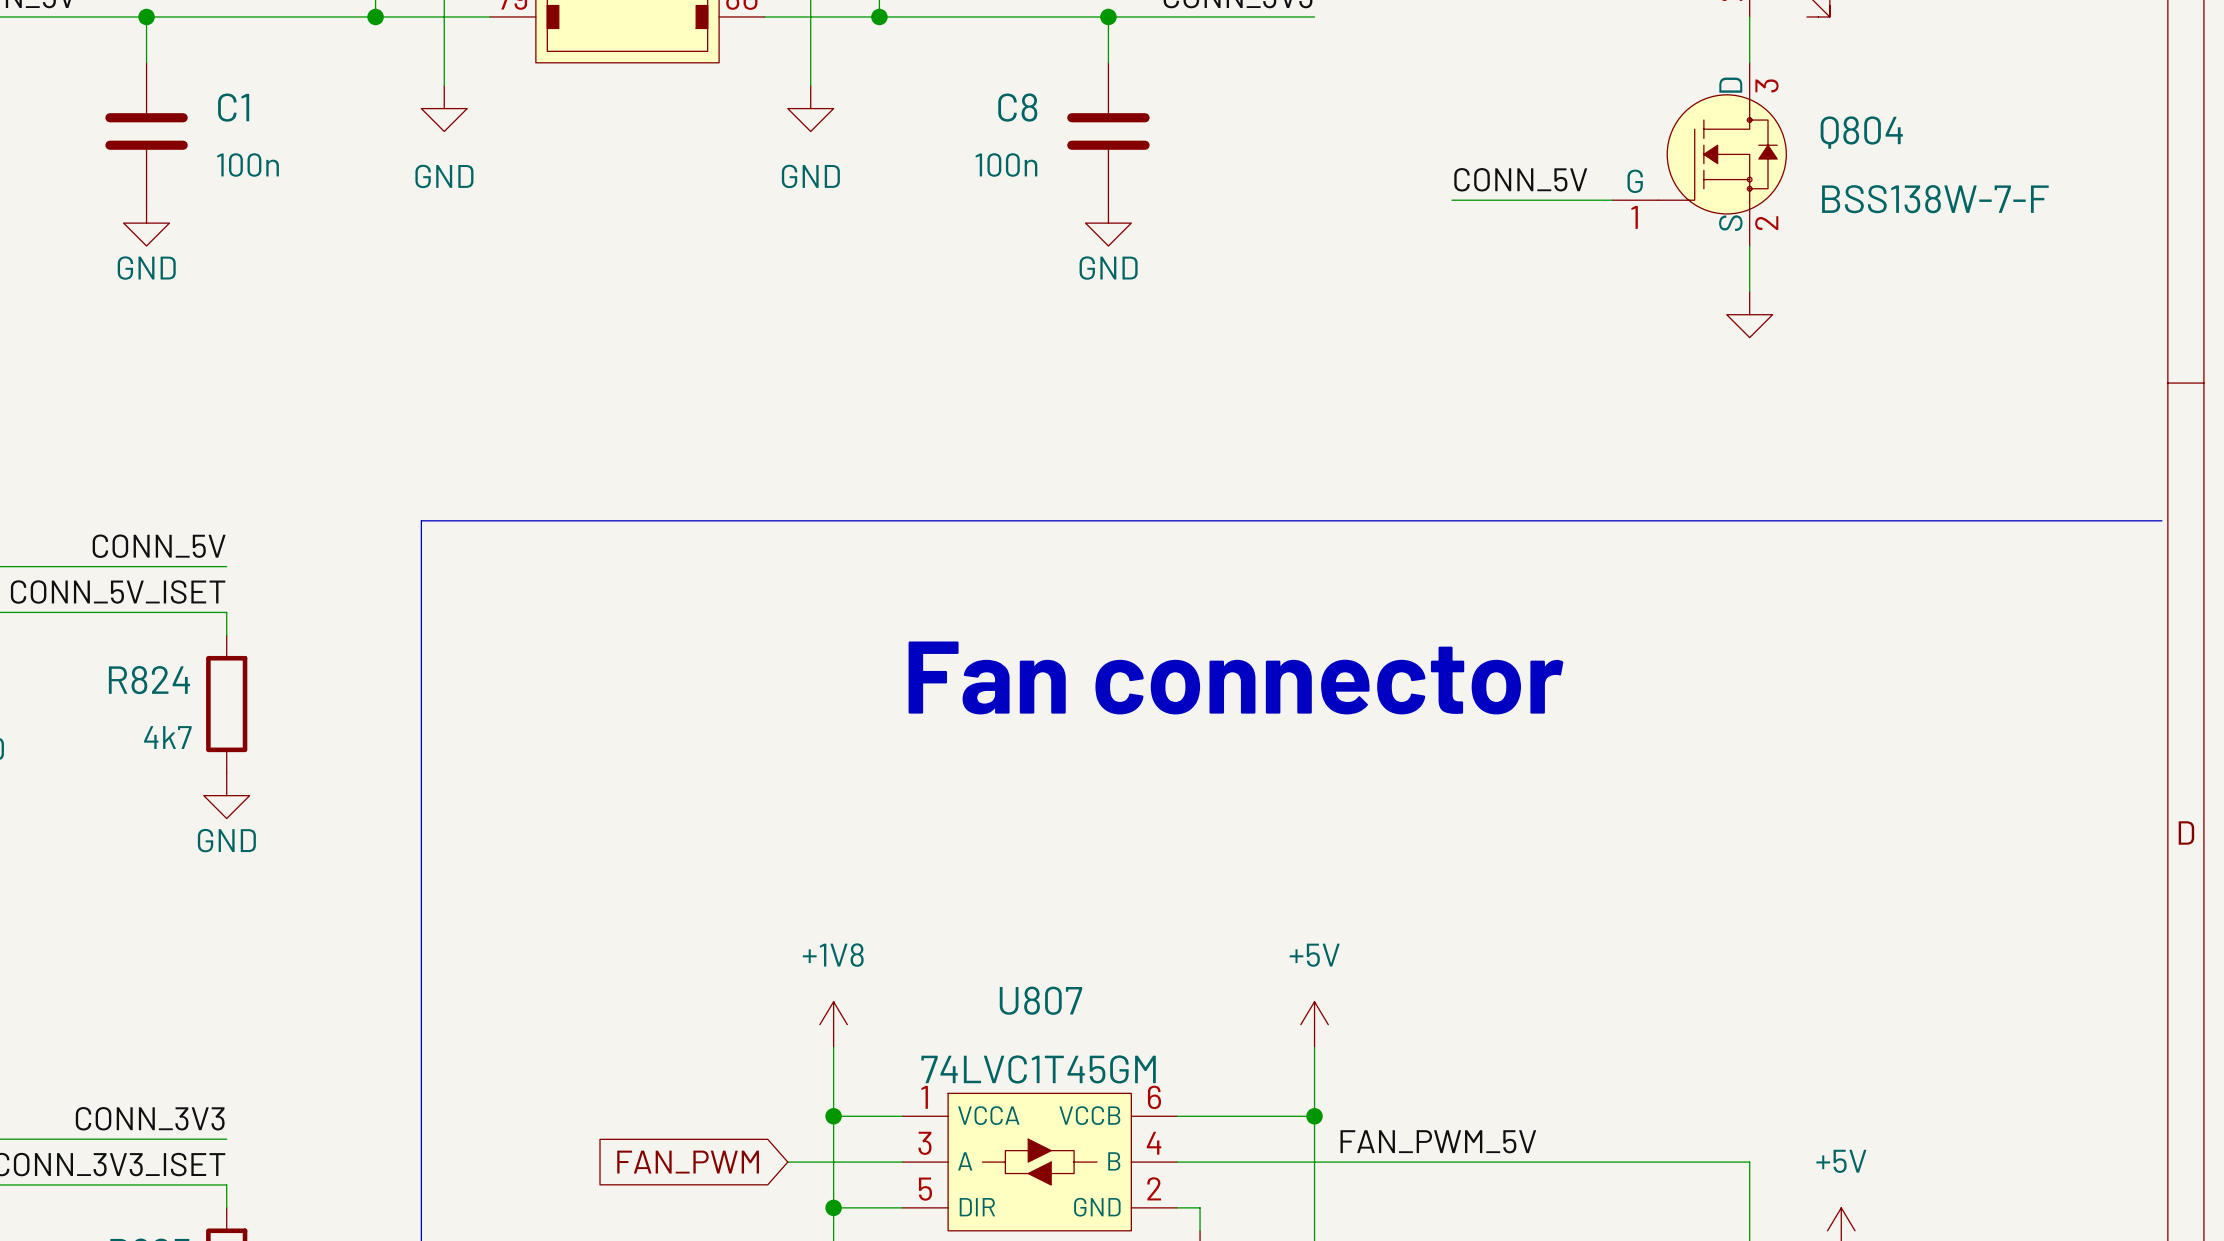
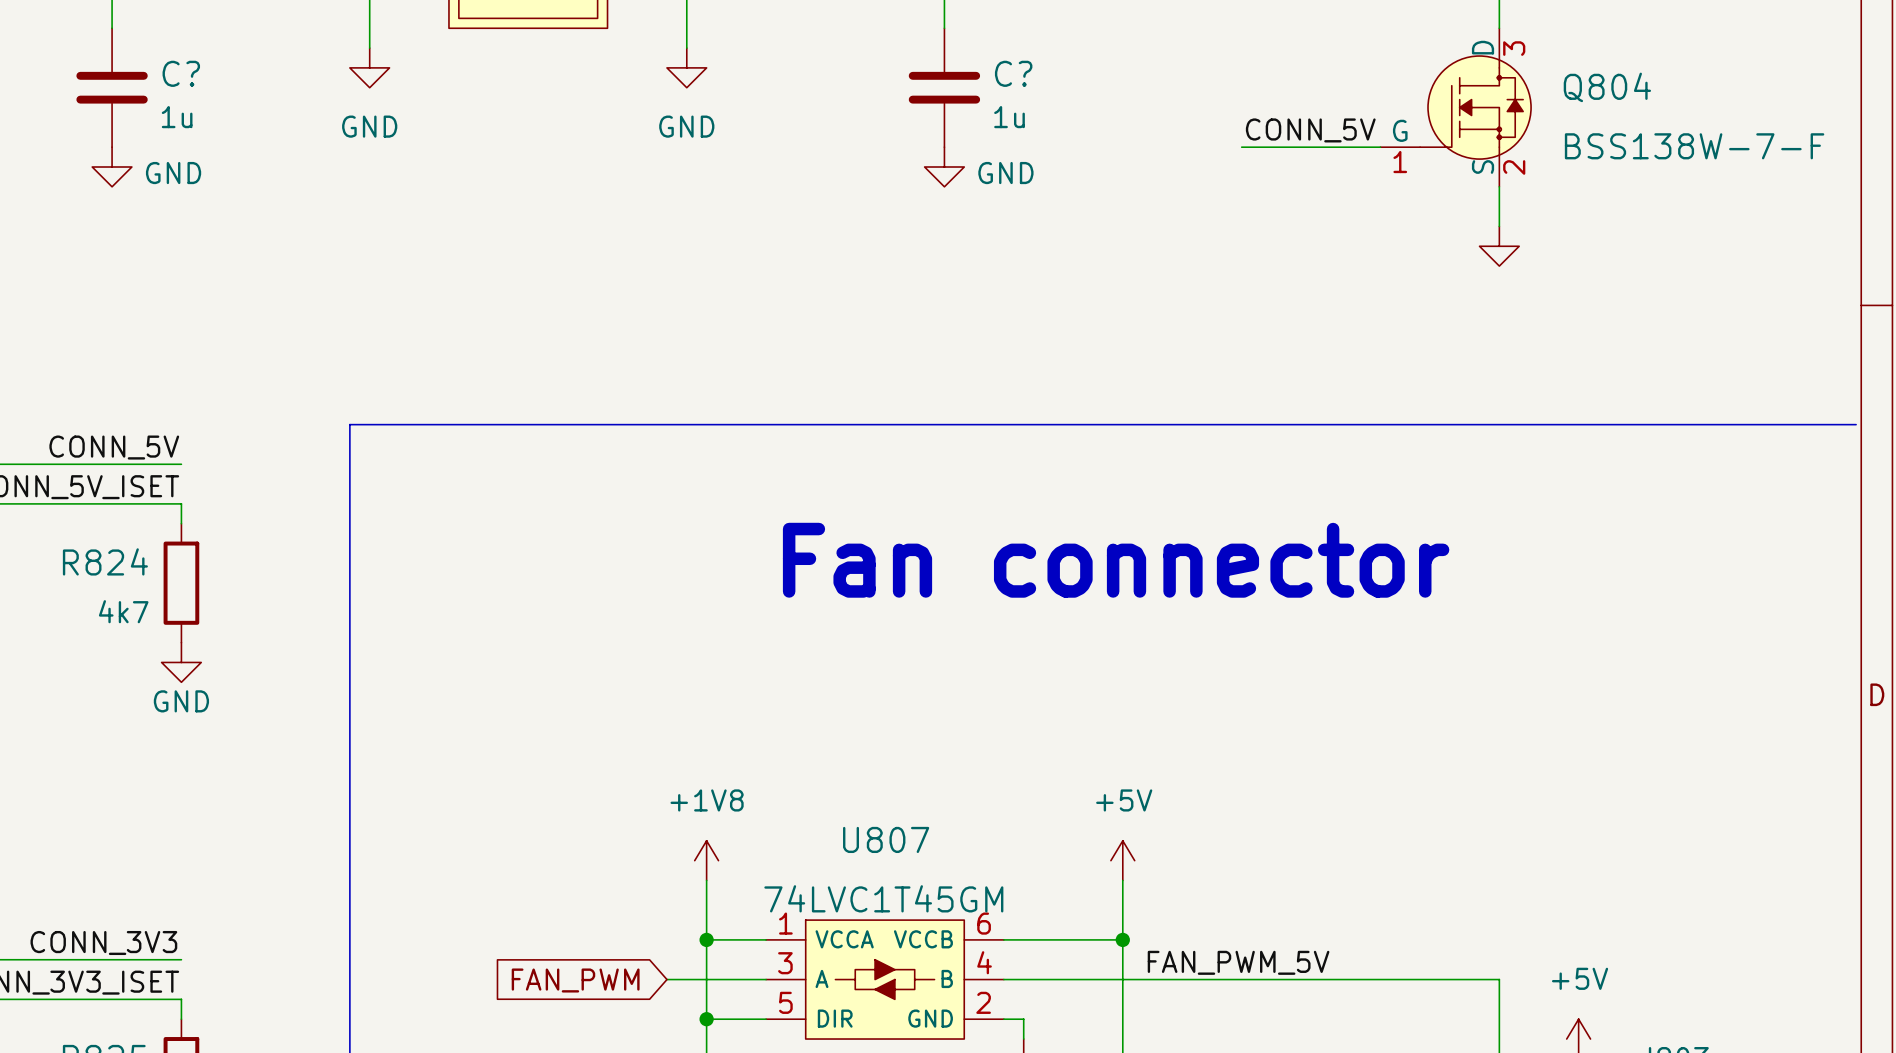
C1 name: C1 (233, 107) -> C? (181, 73)
C8 name: C8 (1017, 107) -> C? (1013, 73)
C1 text: 100n (248, 165) -> 1u (177, 117)
C8 text: 100n (1006, 165) -> 1u (1009, 117)
power symbol text position: GND (146, 268) -> GND (173, 173)
power symbol text position: GND (1108, 268) -> GND (1005, 173)

